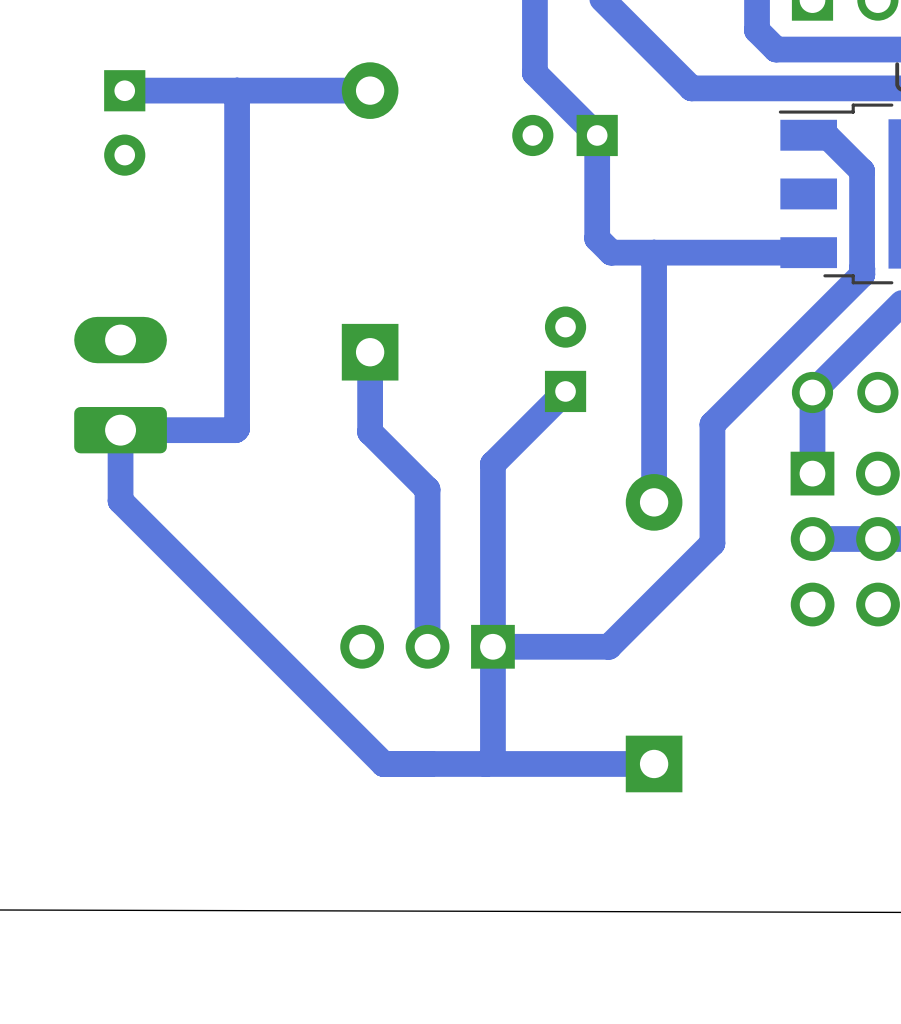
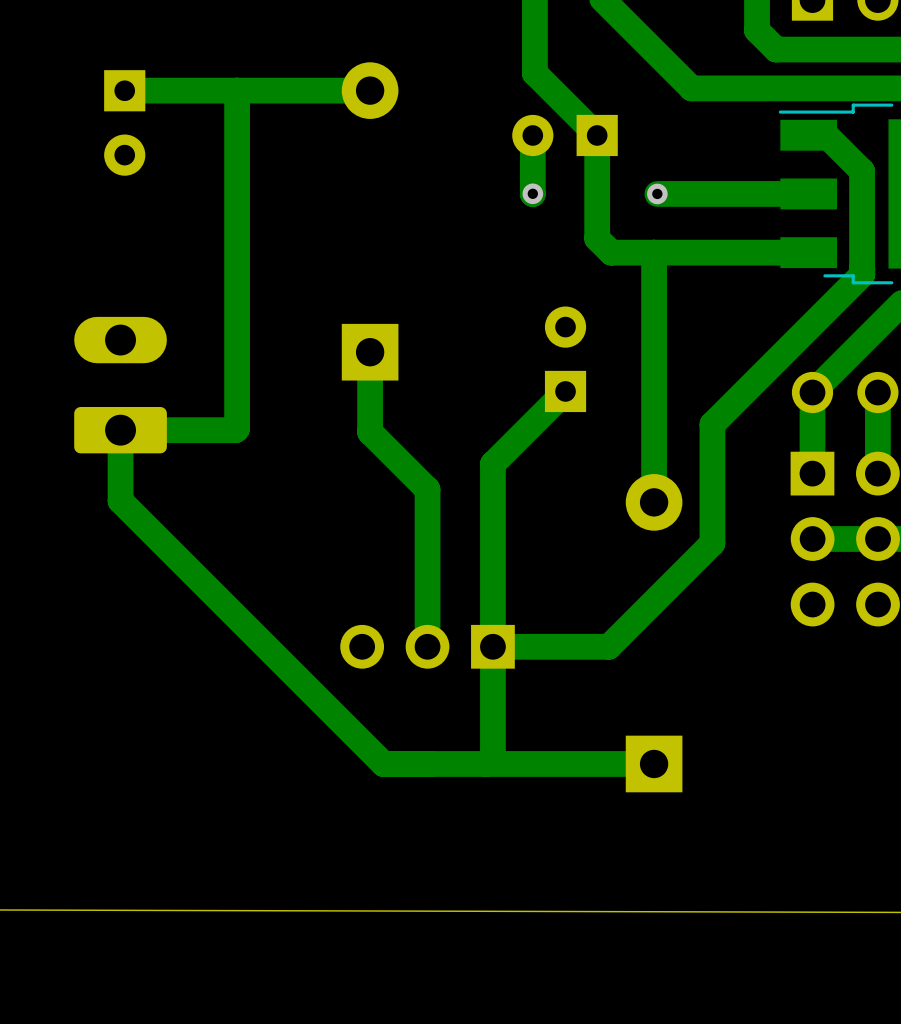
track: none -> (532, 135) (532, 194)
via: none -> (532, 193)
via: none -> (657, 193)
track: none -> (808, 193) (657, 193)
track: none -> (877, 392) (877, 473)

